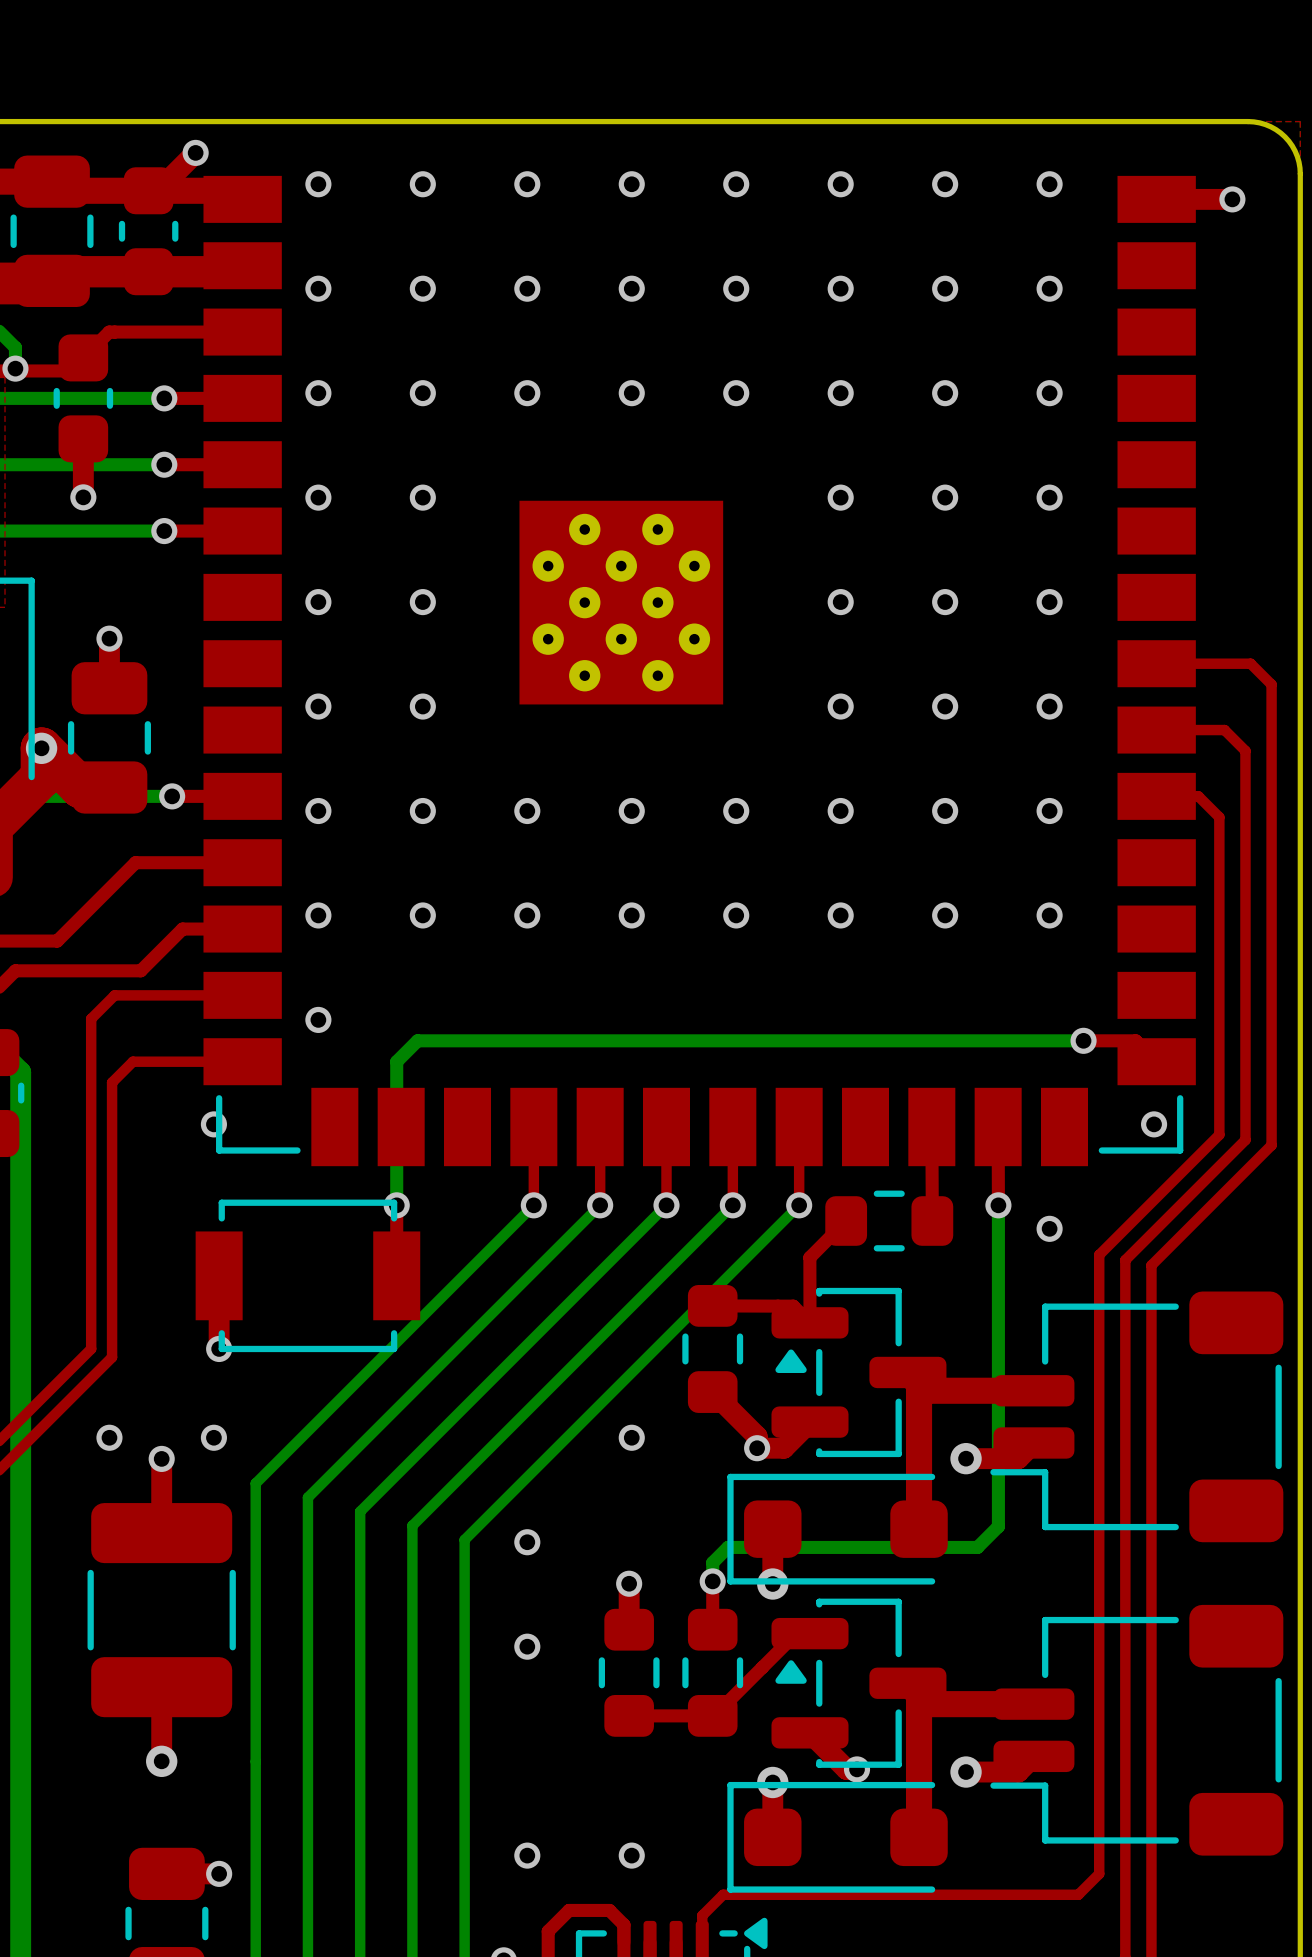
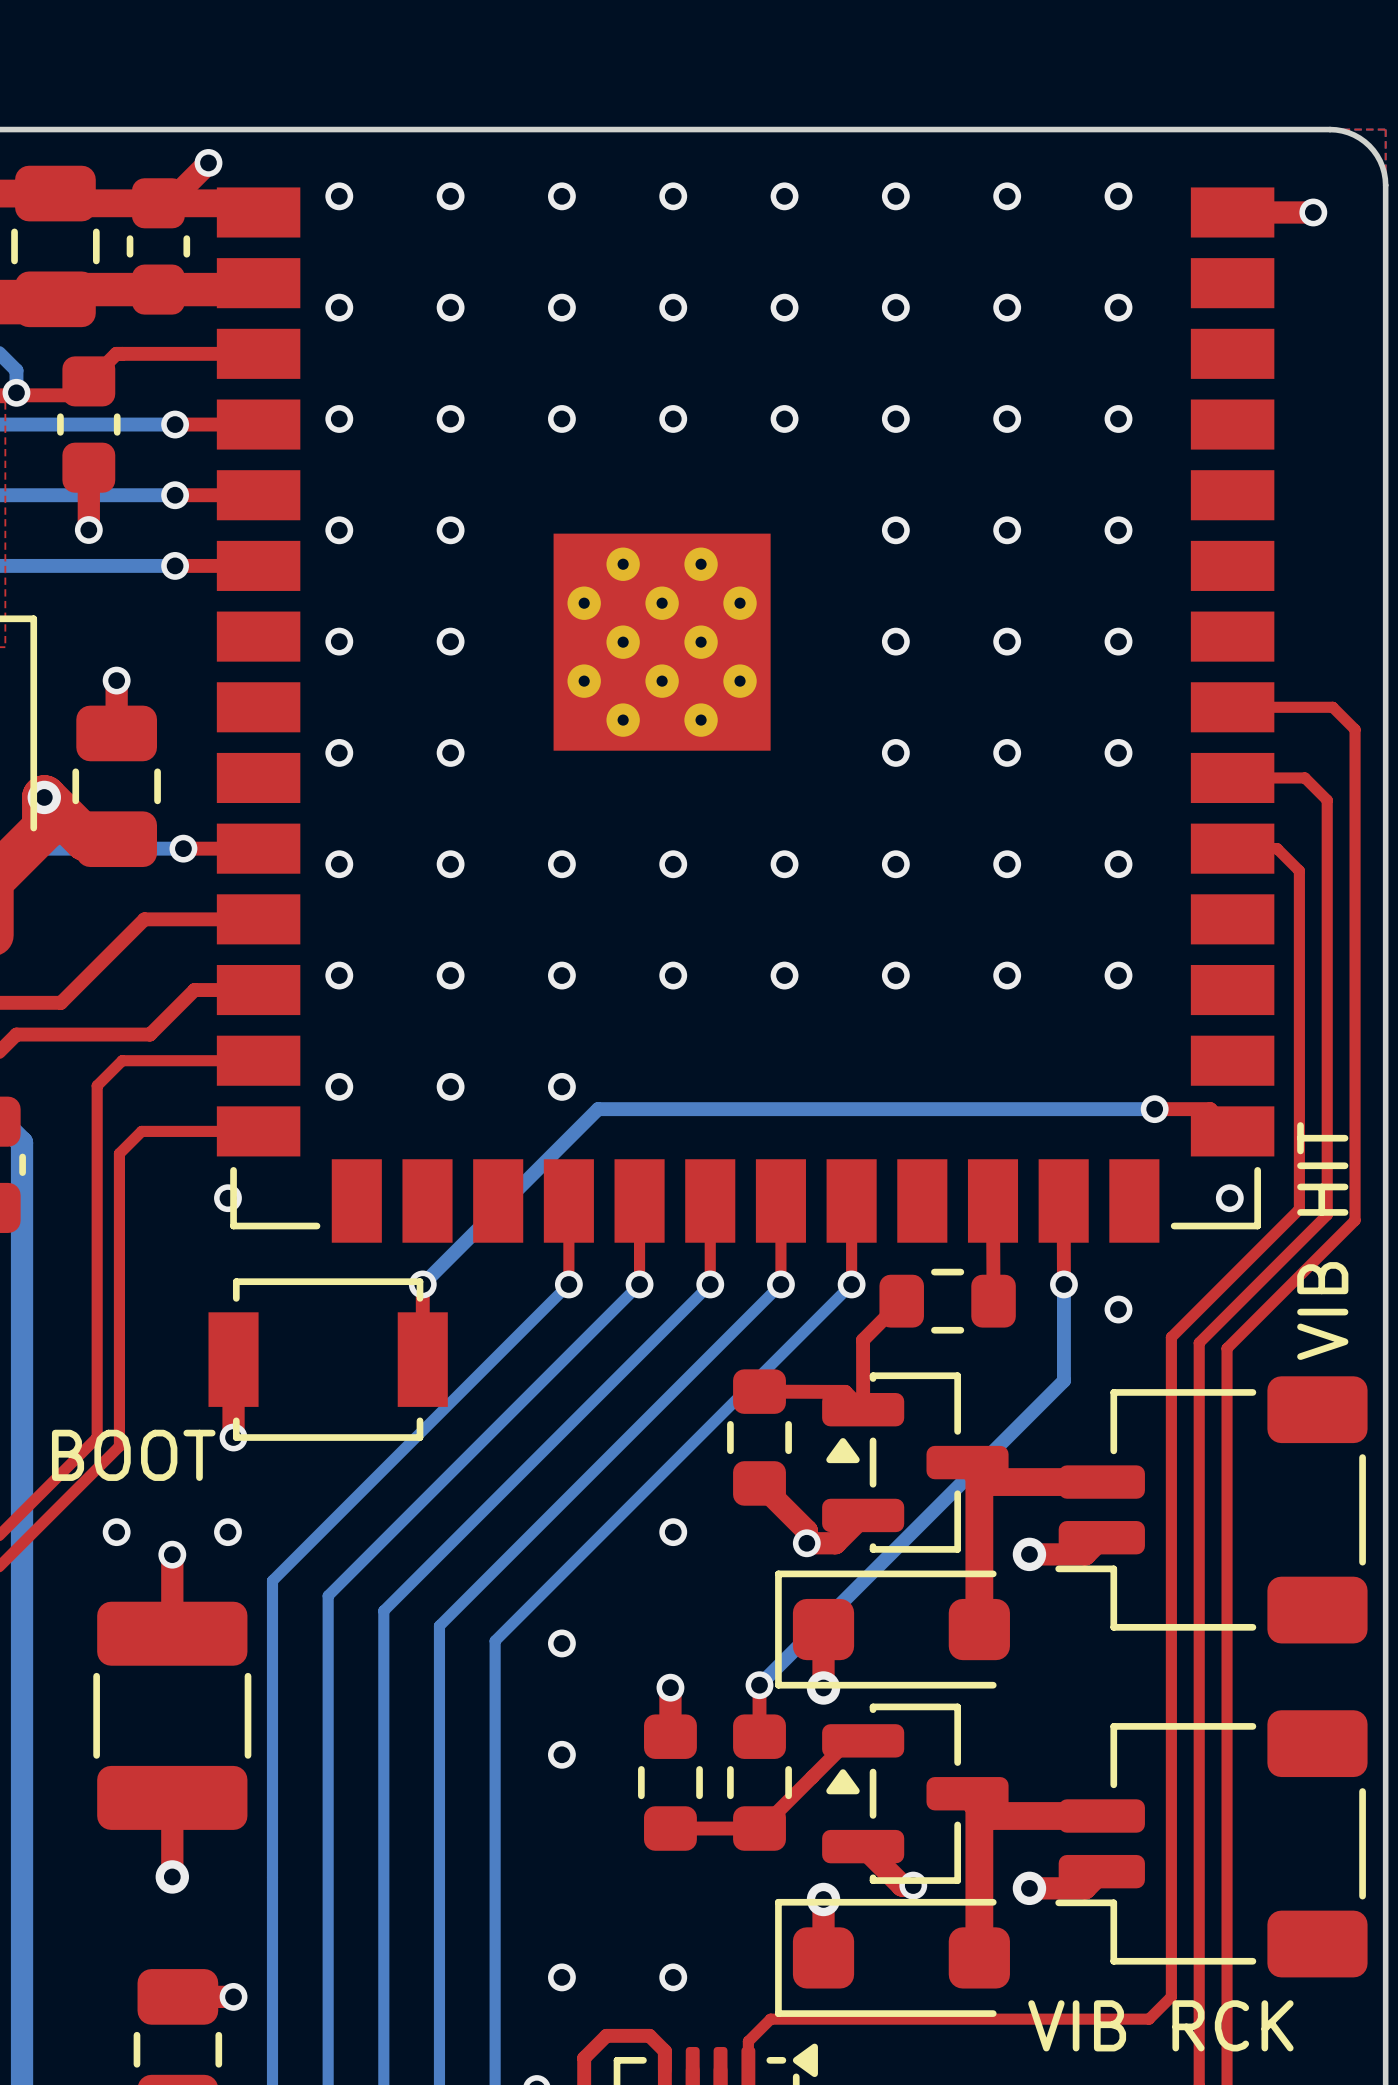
via: none -> (450, 1086)
via: none -> (561, 1086)
bottom track: (561, 1040) (417, 1040) (396, 1061) (396, 1205) -> (598, 1109) (422, 1284)
text: none -> VIB HIT (1322, 1241)
bottom track: (998, 1295) (998, 1526) (977, 1547) (728, 1547) (712, 1562) (712, 1581) -> (1063, 1380) (759, 1685)
text: none -> BOOT (133, 1455)
text: none -> VIB RCK (1160, 2025)

